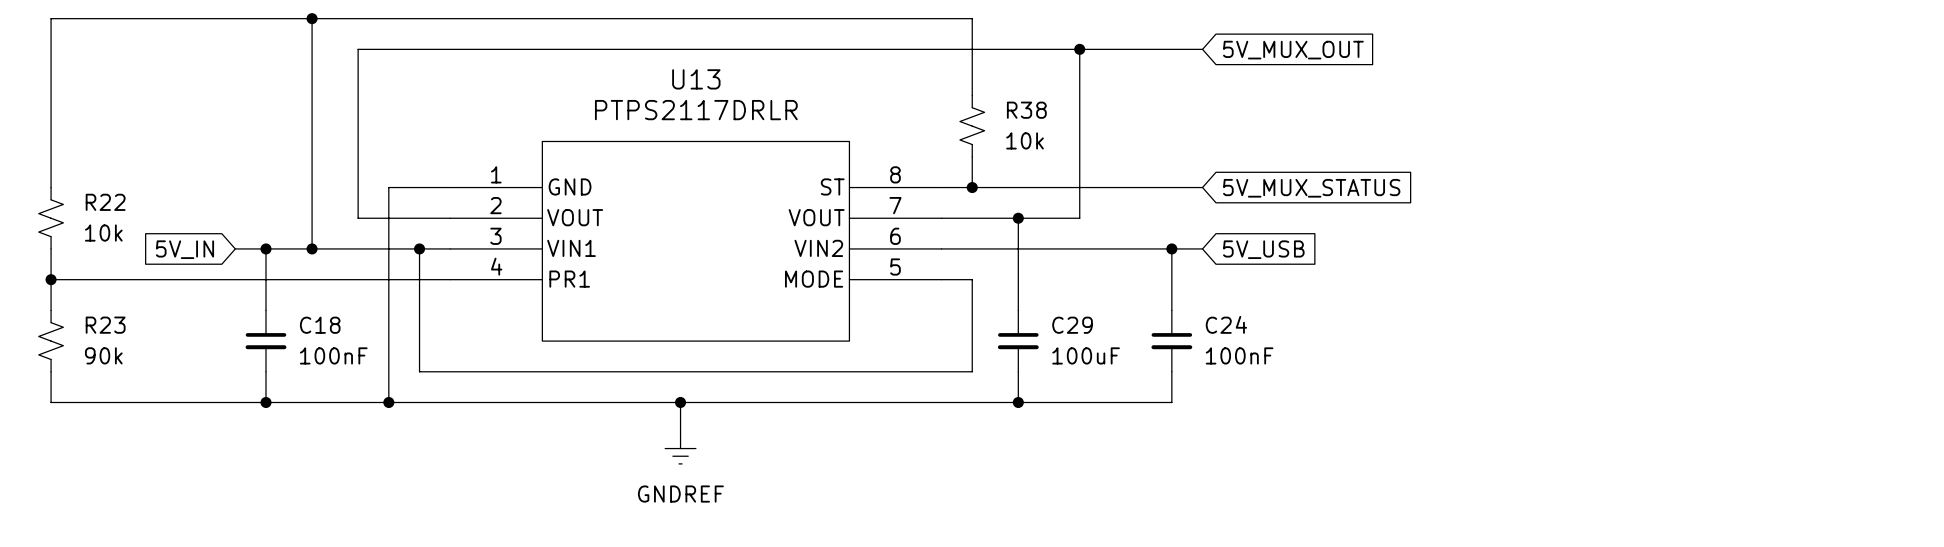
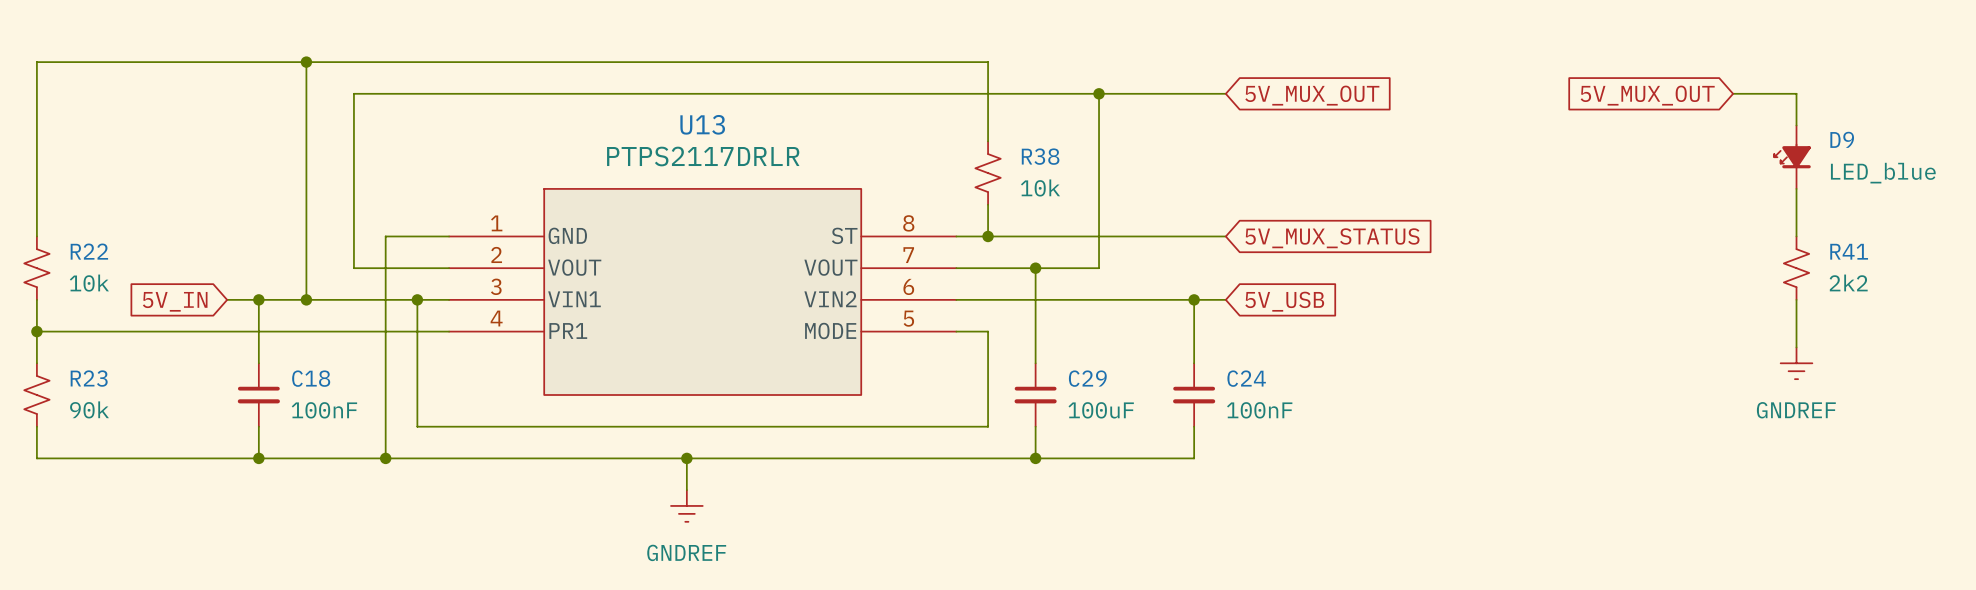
wire: none -> (1733, 93) (1796, 93) (1796, 125)
global label: none -> 5V_MUX_OUT (1647, 95)
D9: none -> LED_blue (1792, 157)
wire: none -> (1796, 188) (1796, 236)
R41: none -> 2k2 (1796, 268)
wire: none -> (1796, 299) (1796, 347)
power symbol: none -> GNDREF (1796, 363)

